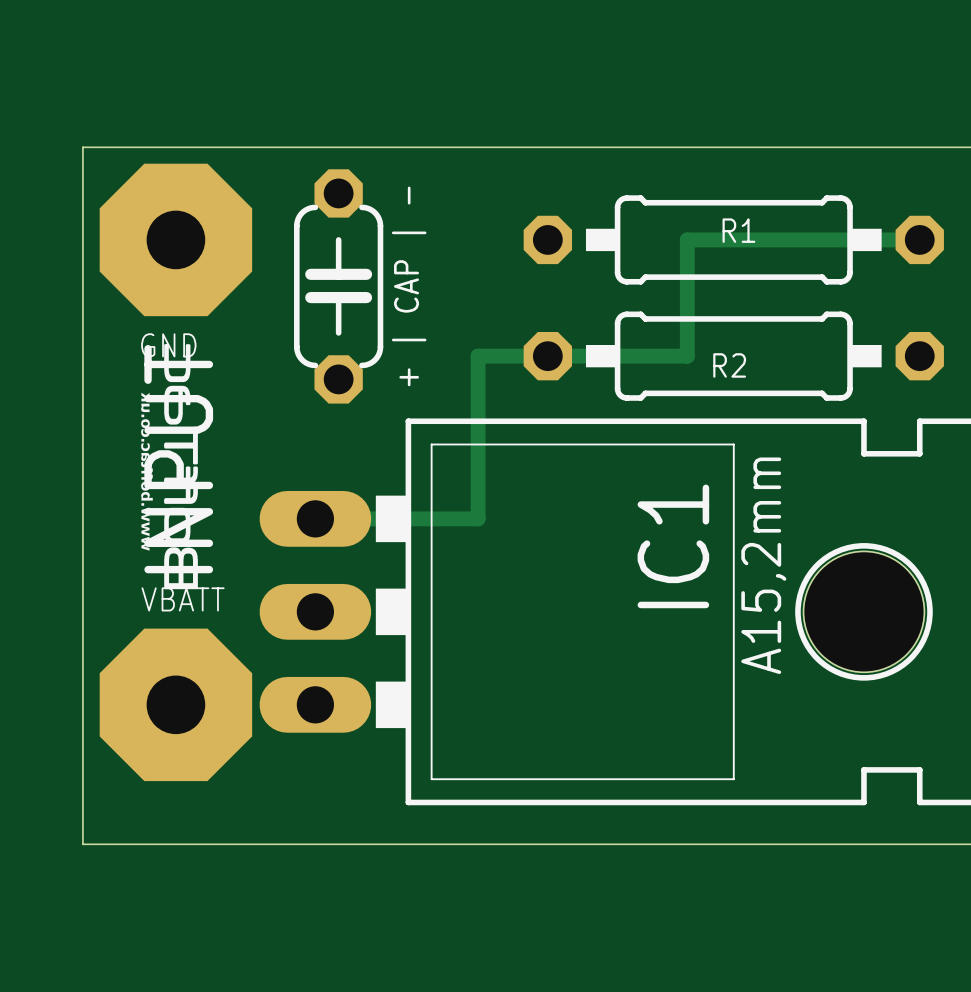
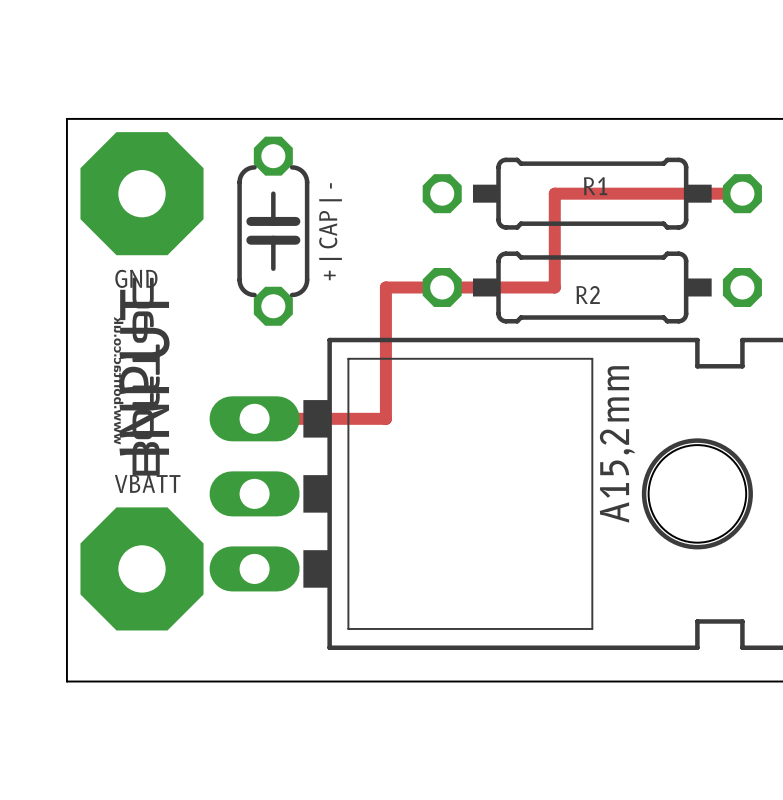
IC1 name: IC1 (673, 546) -> none

